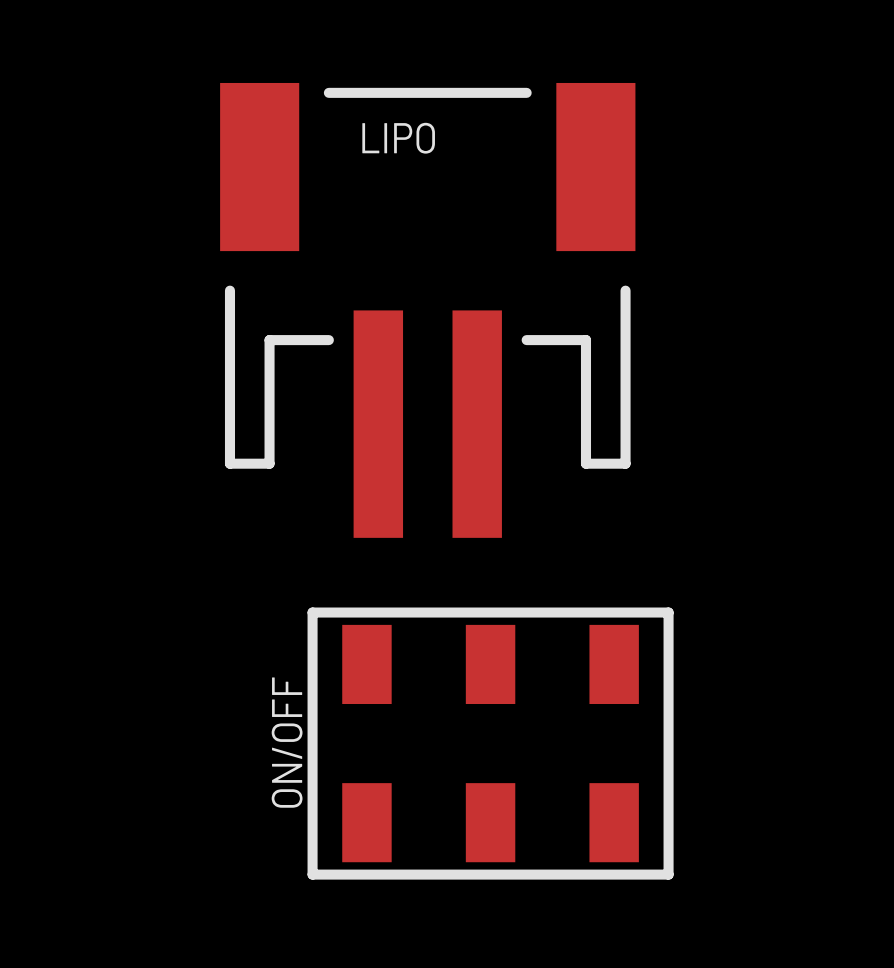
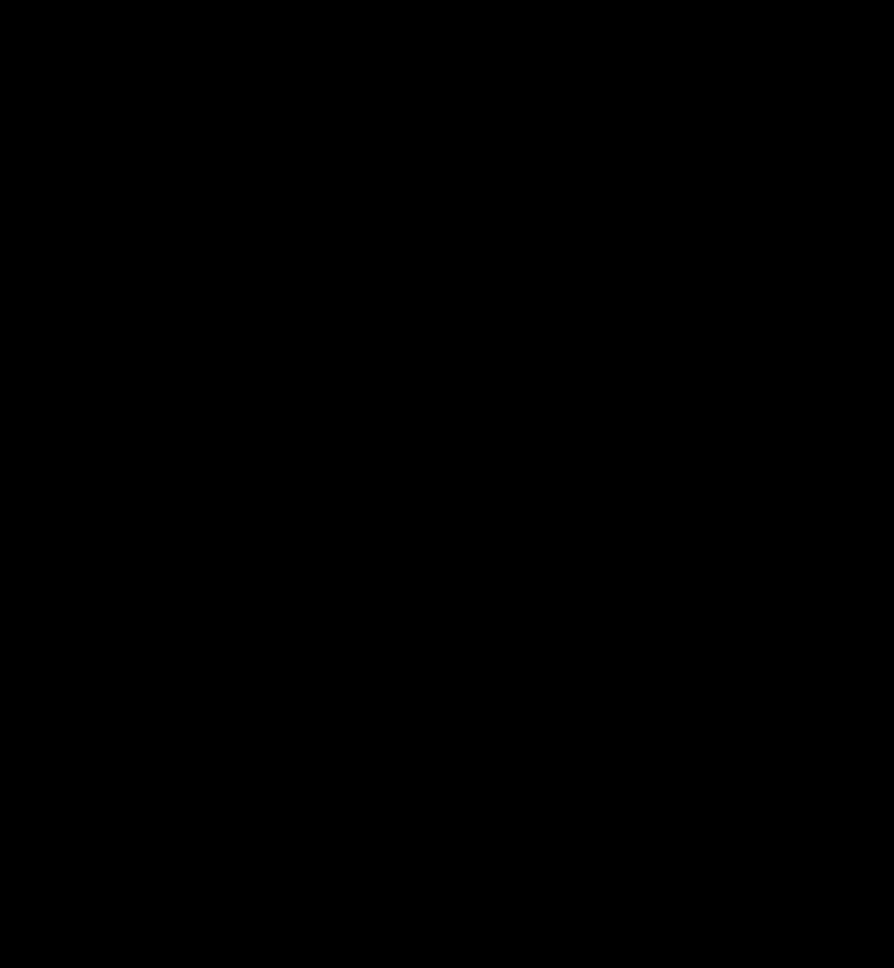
LIPO: (427, 310) -> none
ON/OFF: (490, 743) -> none

